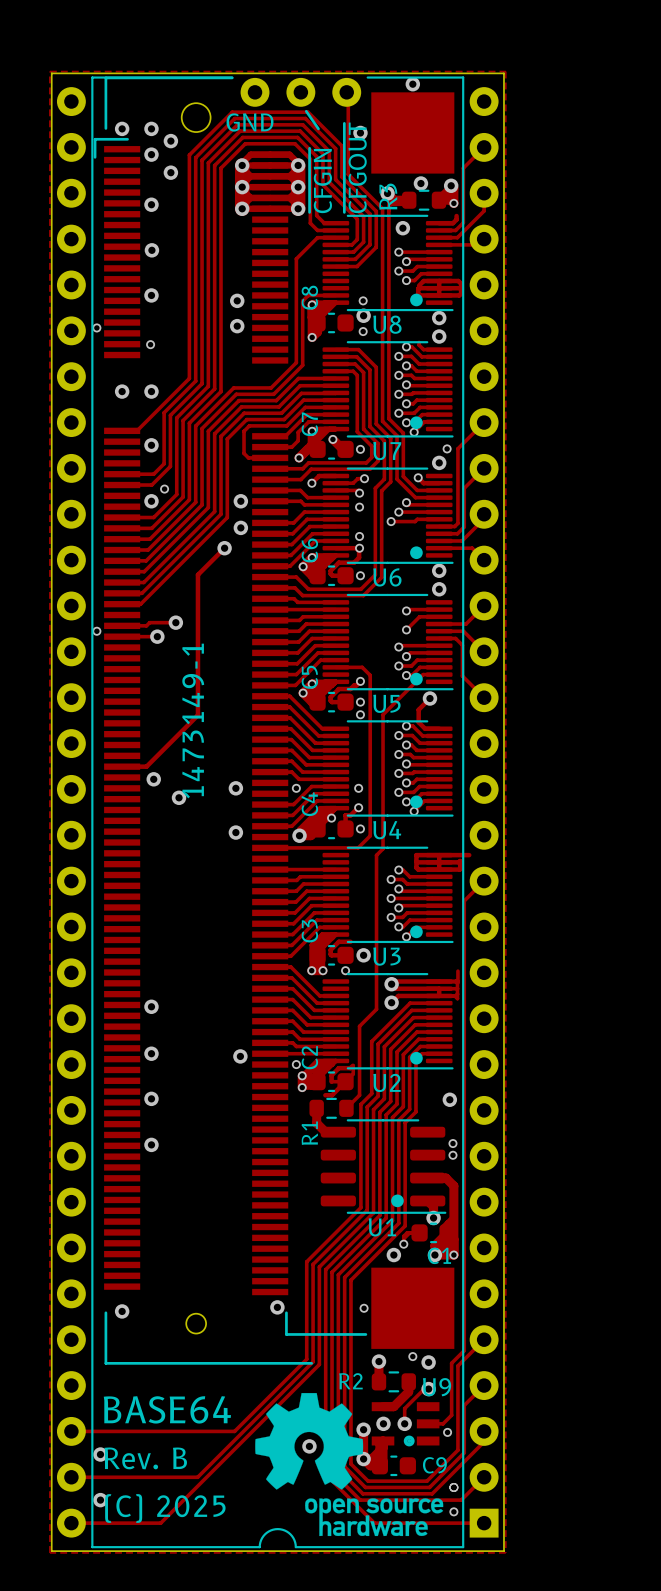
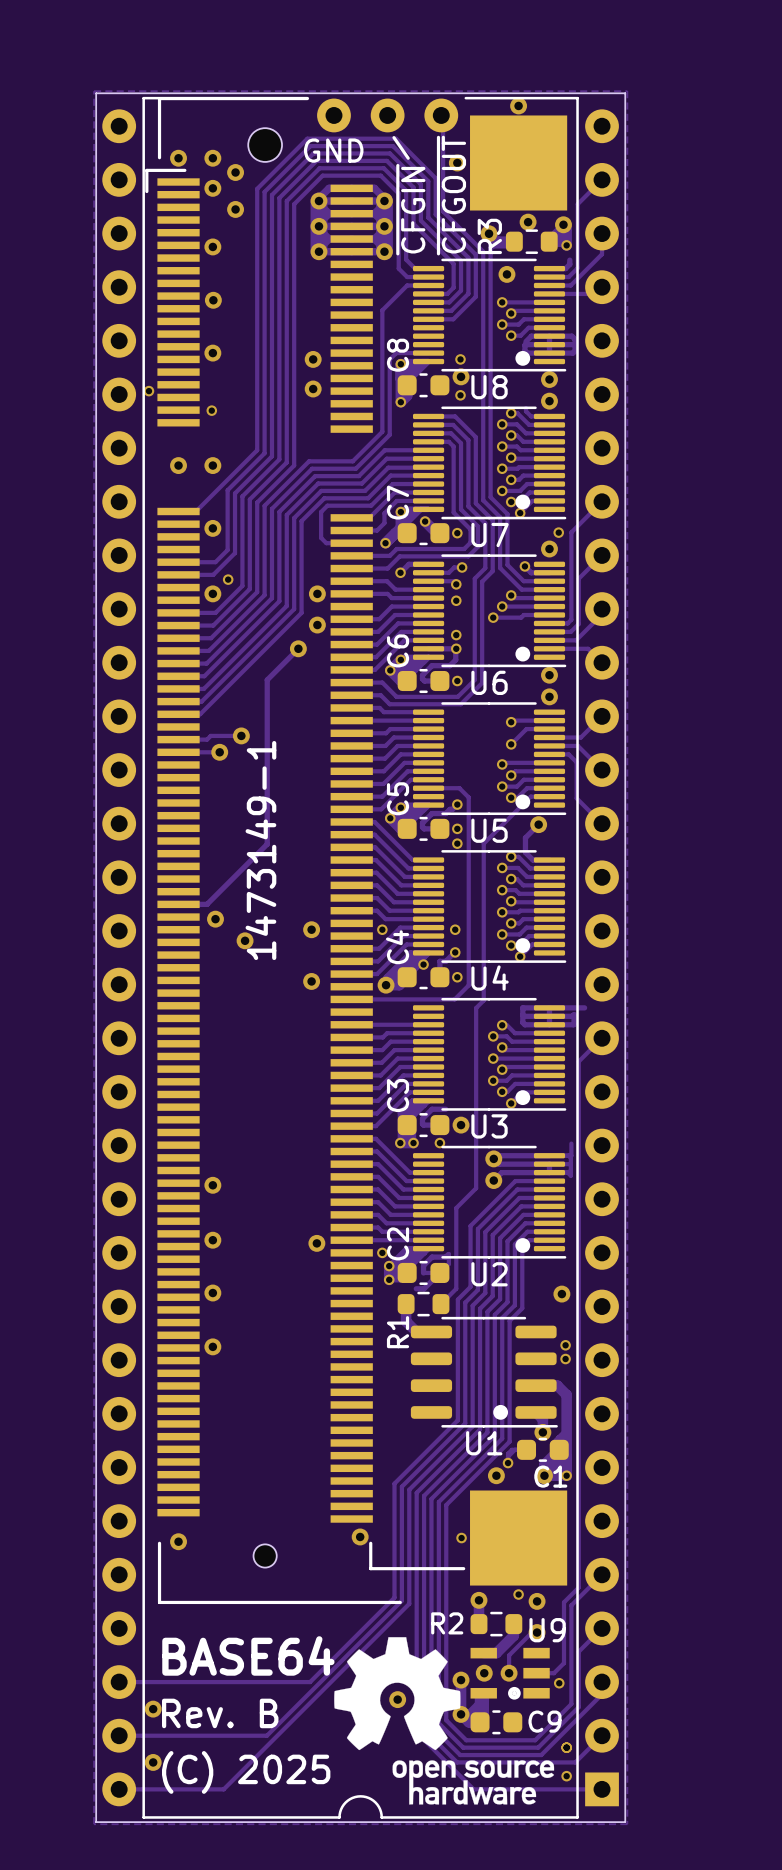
via: (96, 631) -> none

